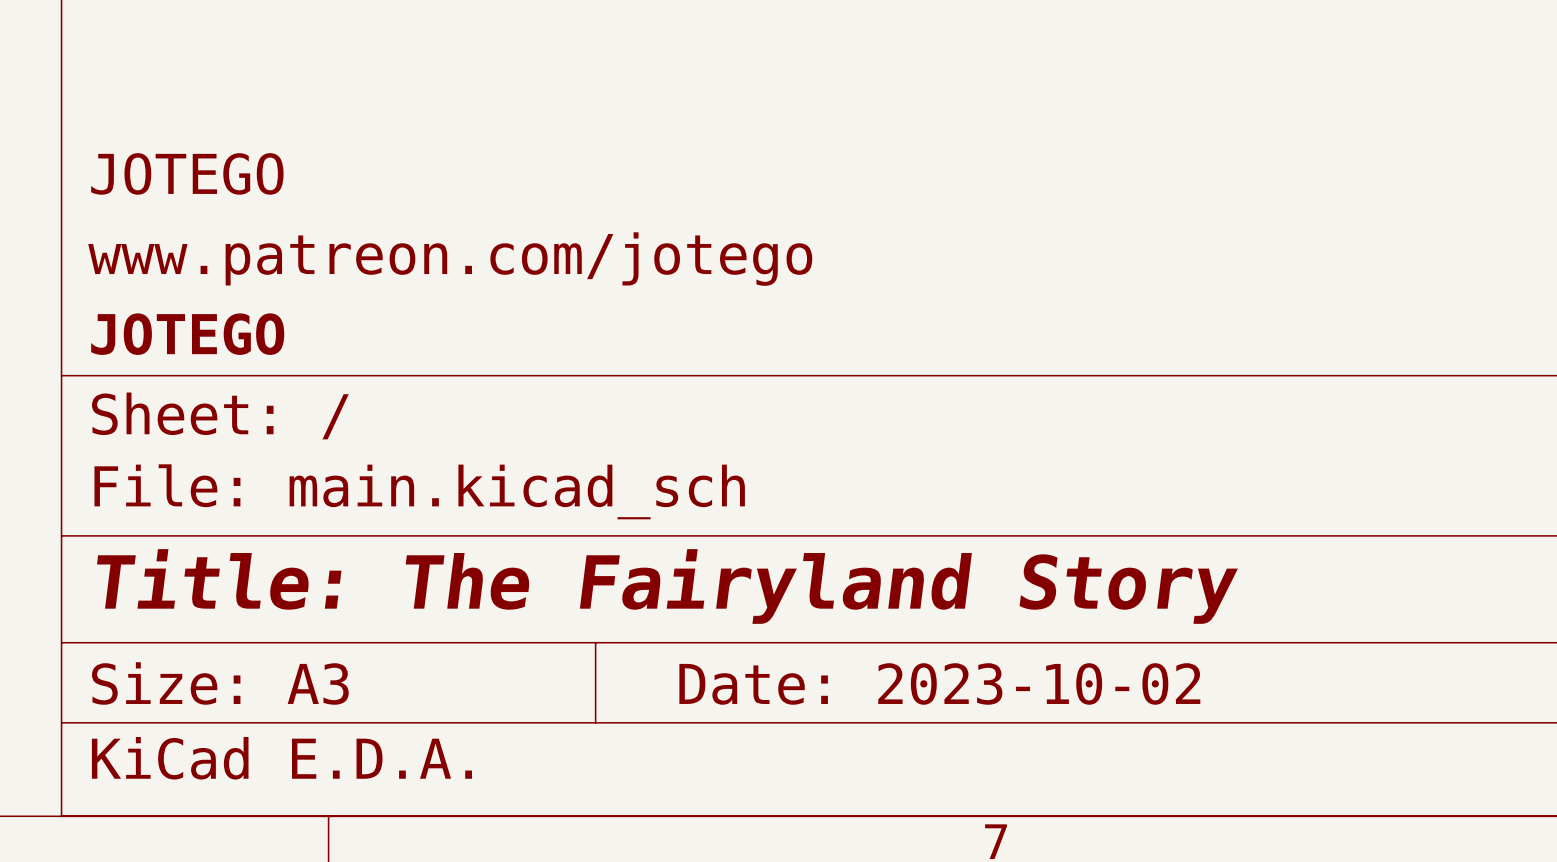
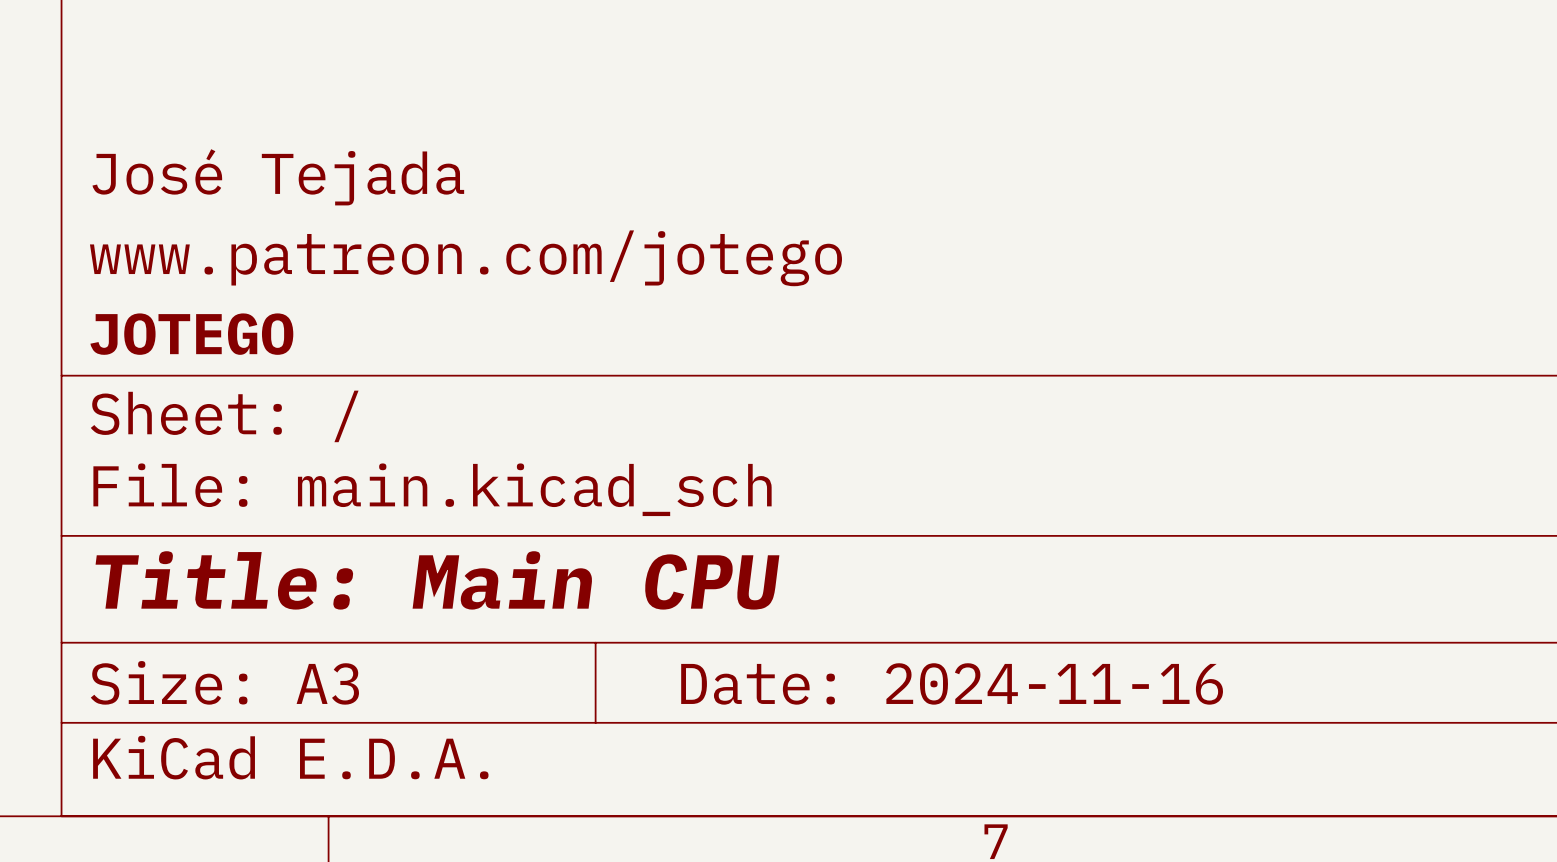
title block: JOTEGO (187, 173) -> José Tejada (278, 177)
title block: Title: The Fairyland Story (667, 586) -> Title: Main CPU (437, 580)
title block: Date: 2023-10-02 (939, 683) -> Date: 2024-11-16 (952, 683)

